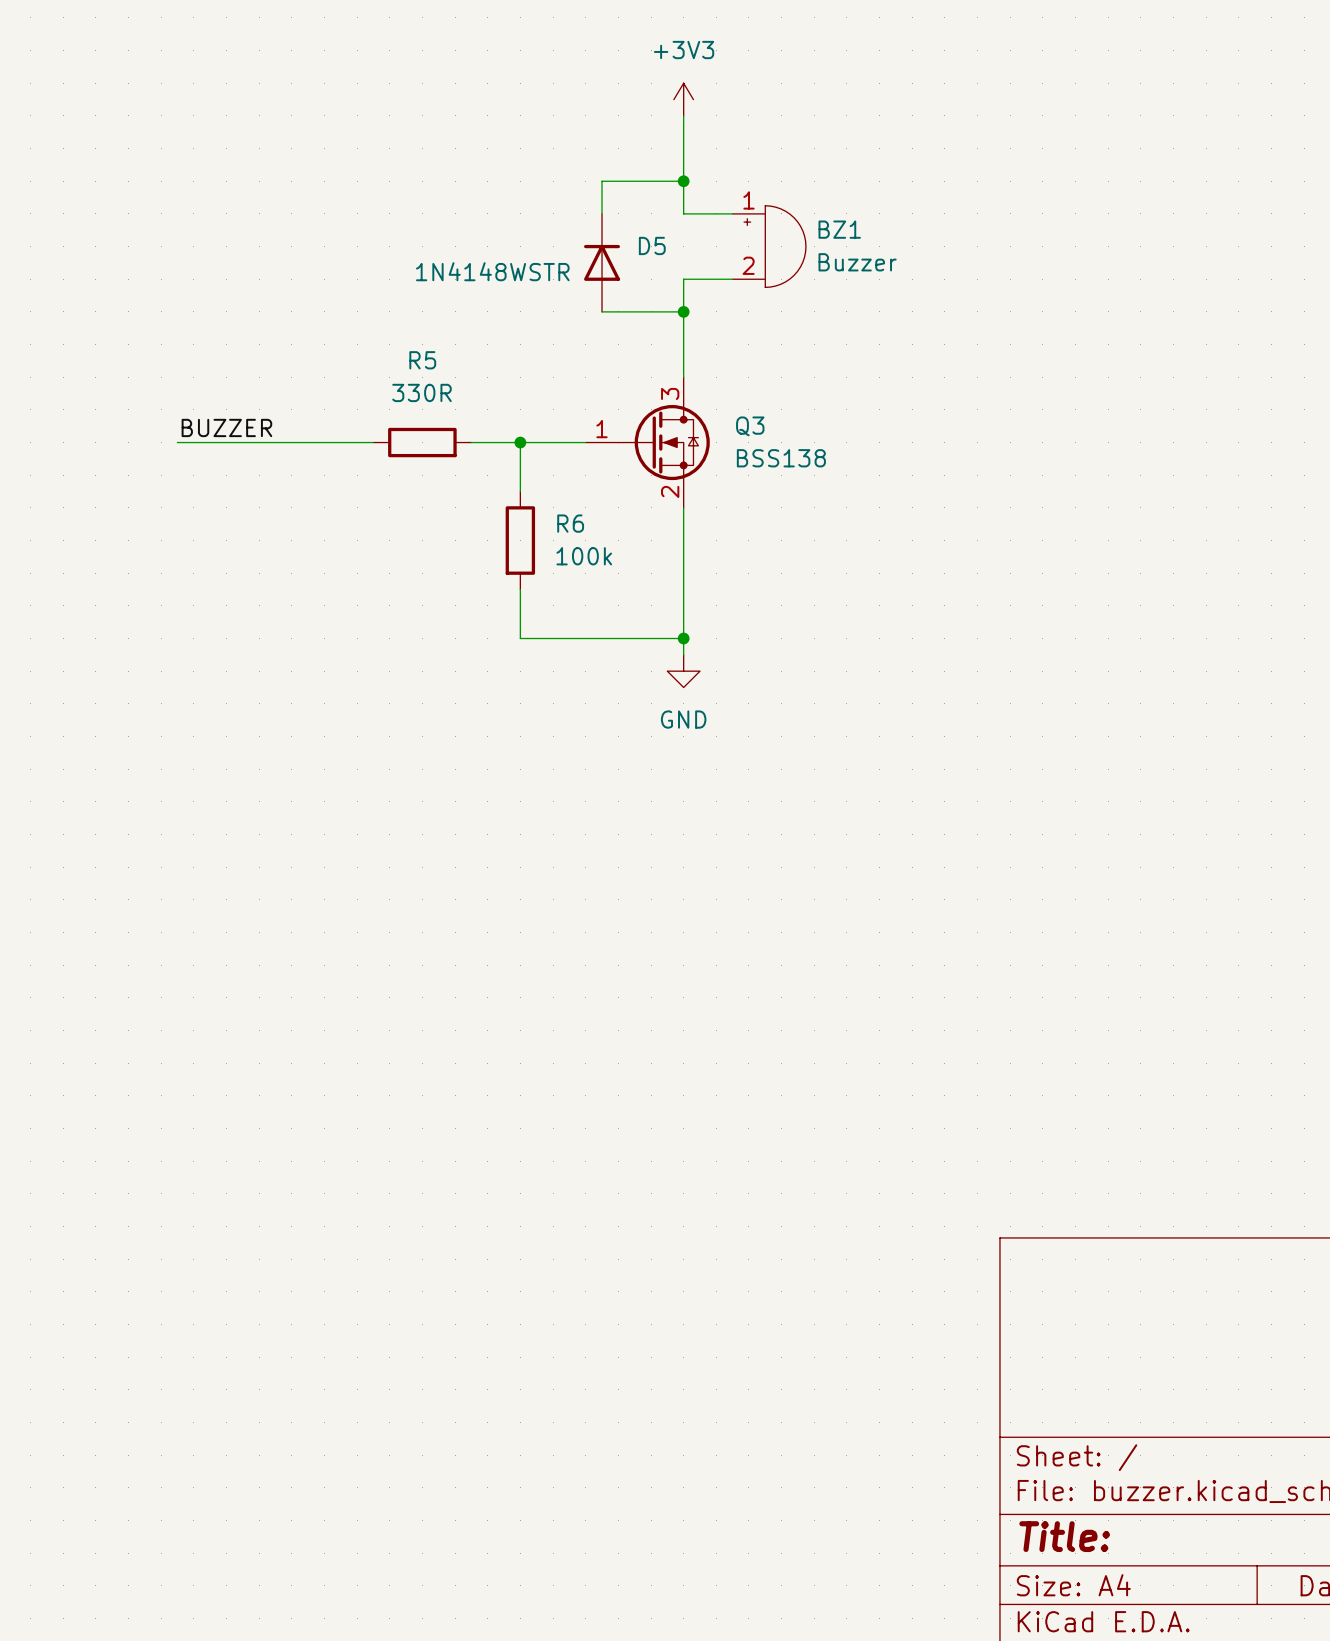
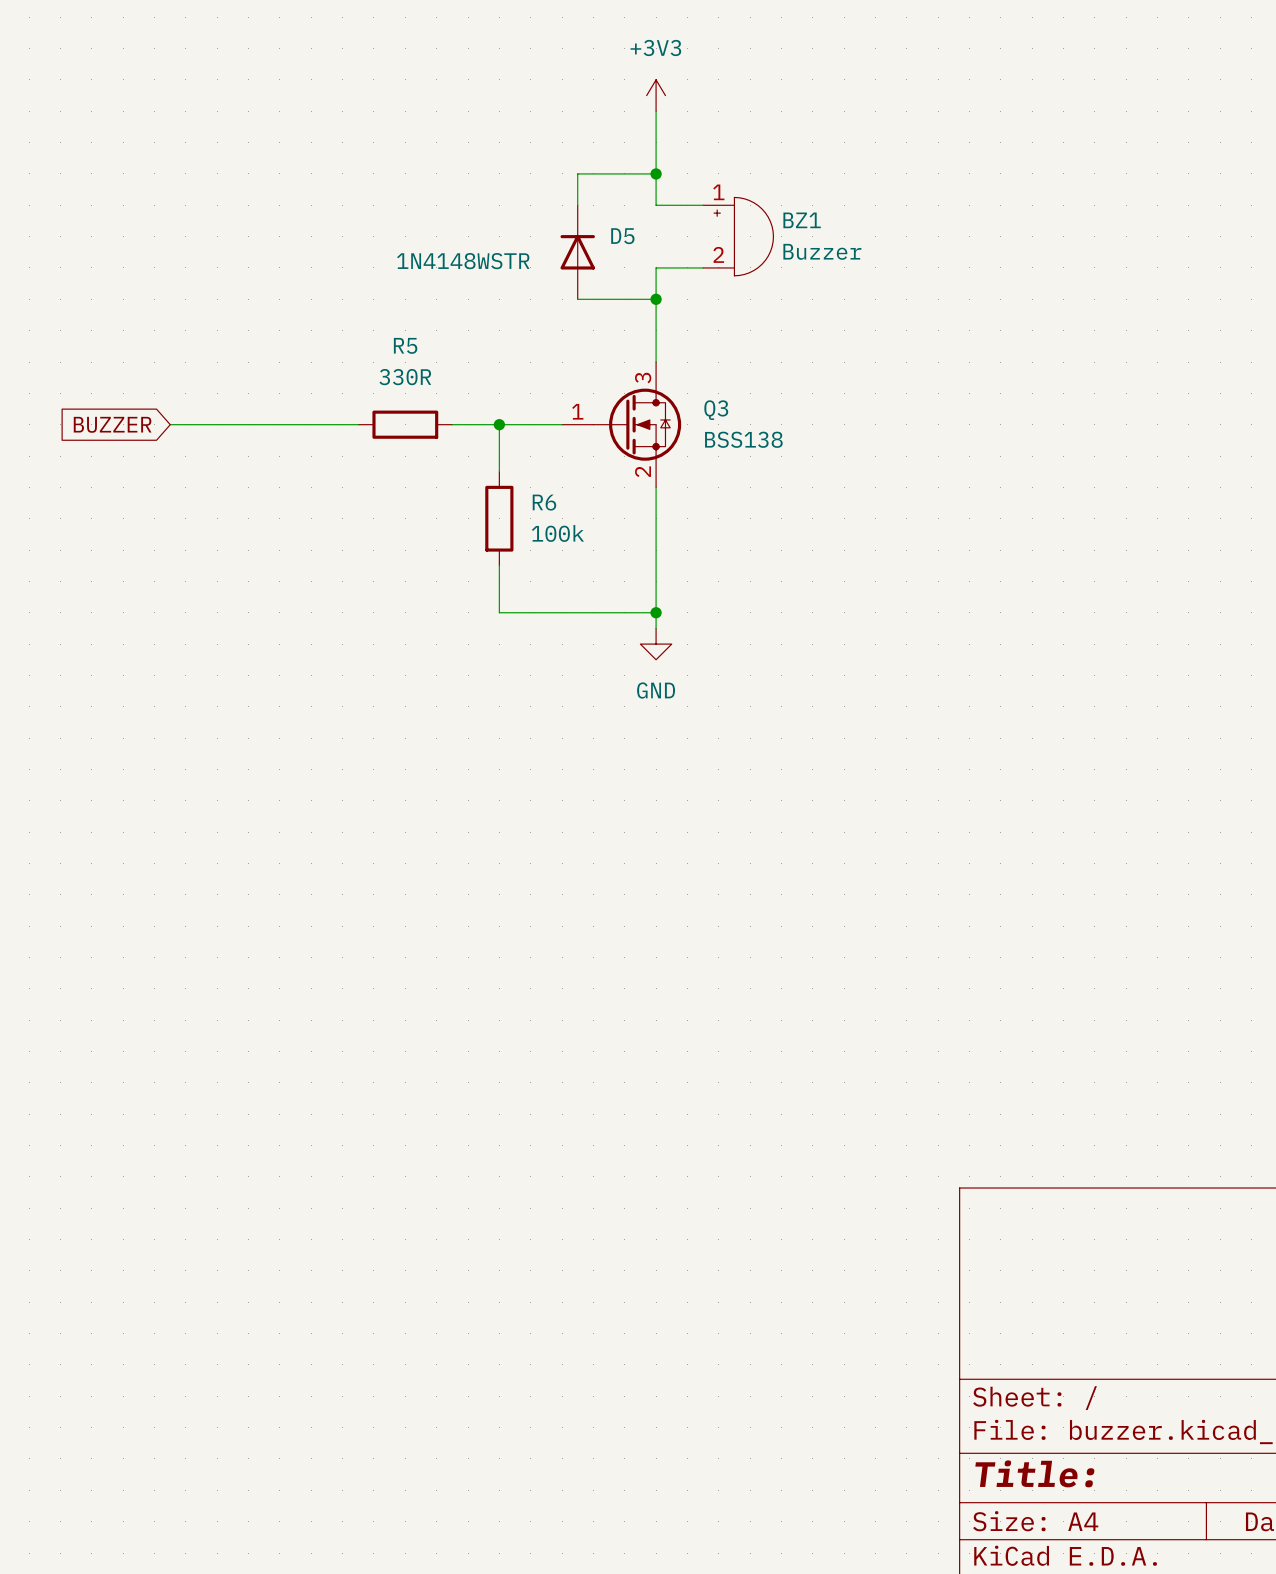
label: BUZZER (226, 427) -> none
global label: none -> BUZZER (112, 424)

